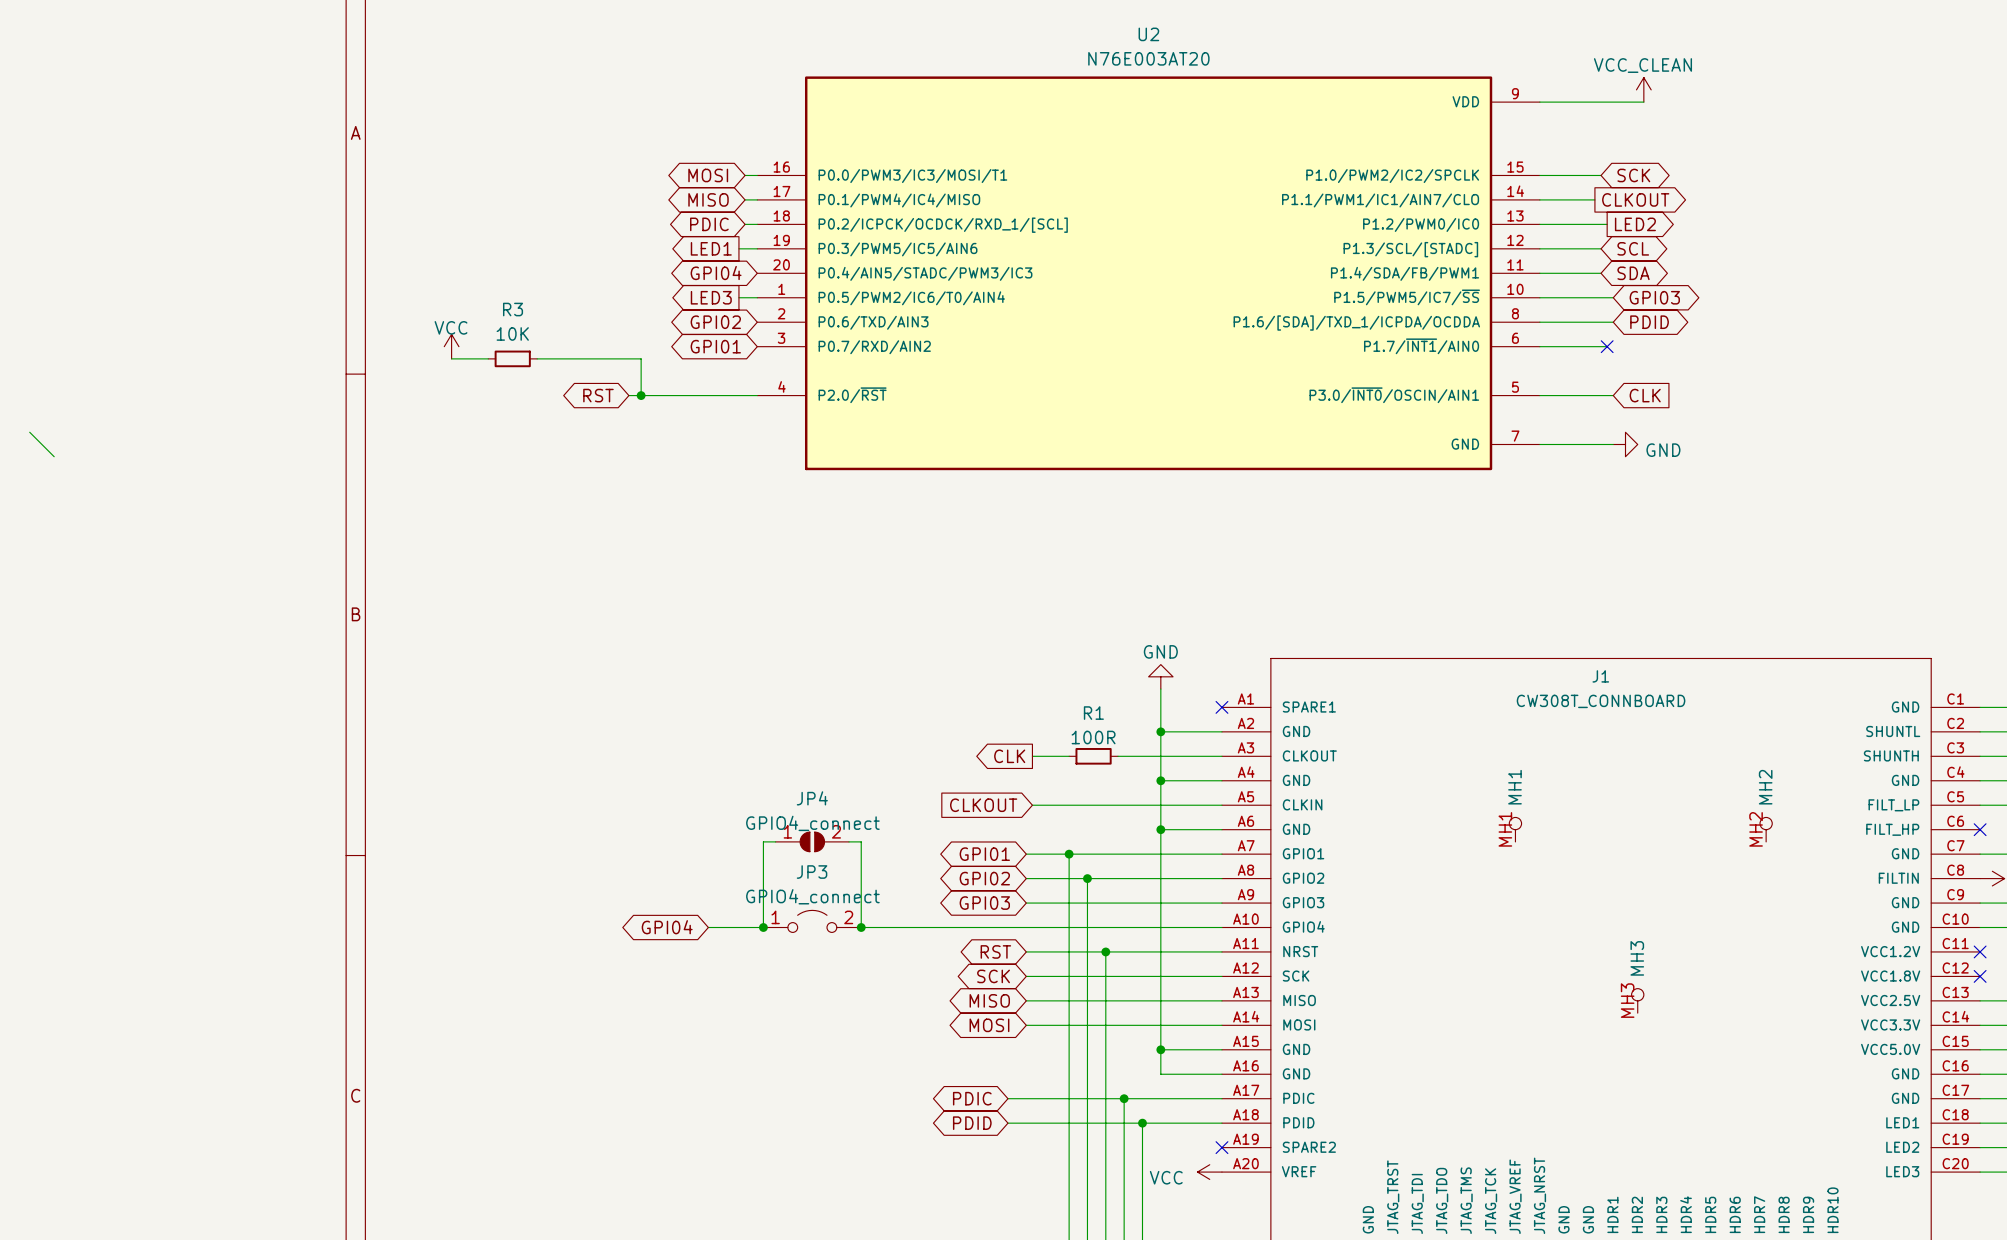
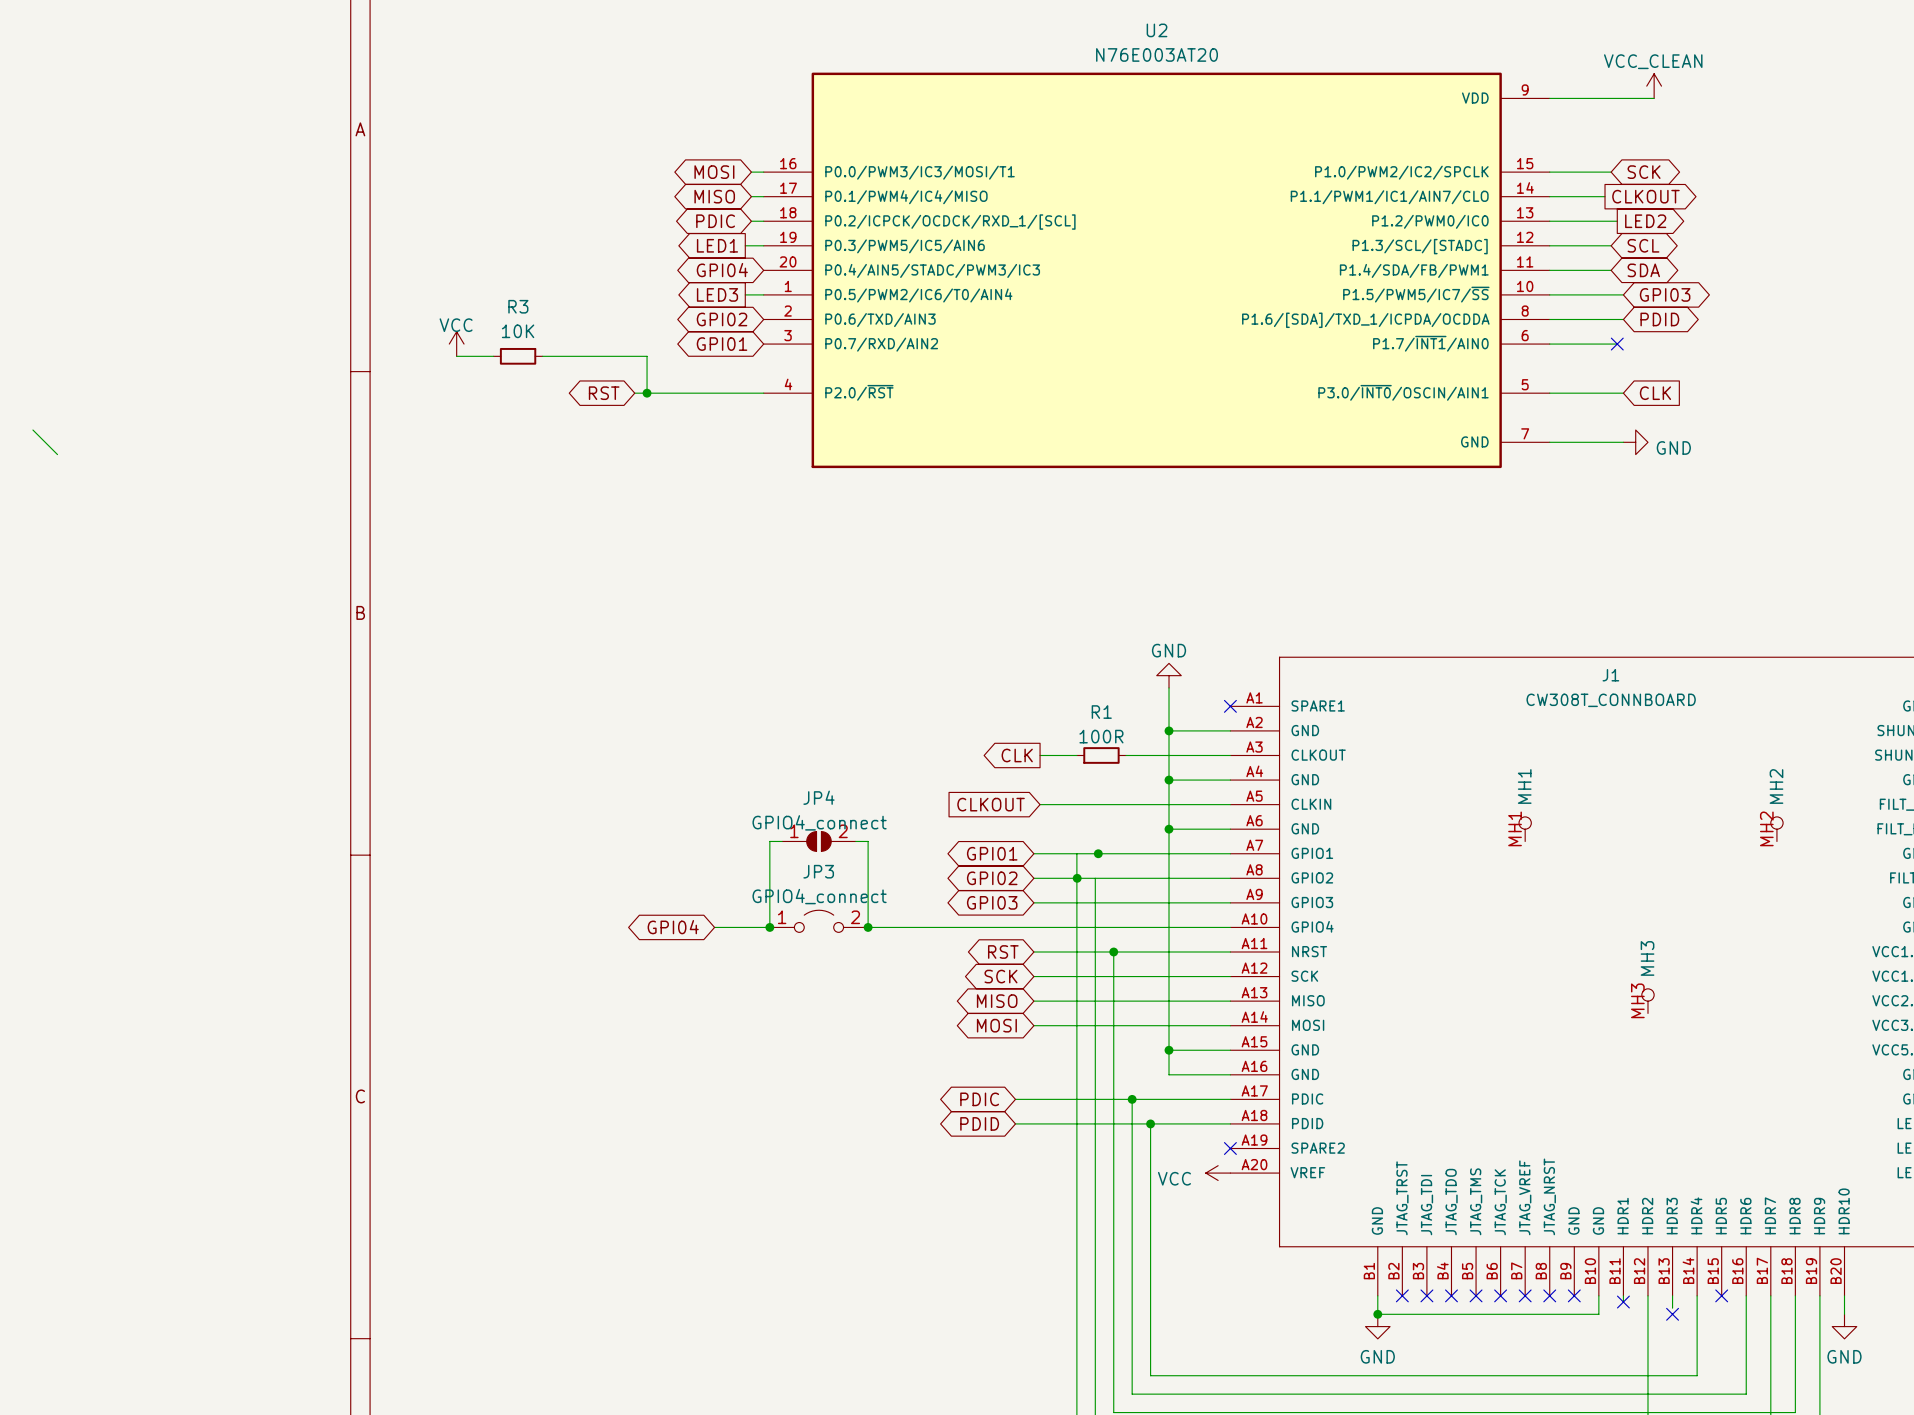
junction: (1069, 854) -> none
junction: none -> (1098, 853)
junction: none -> (1077, 878)
junction: (1087, 878) -> none

